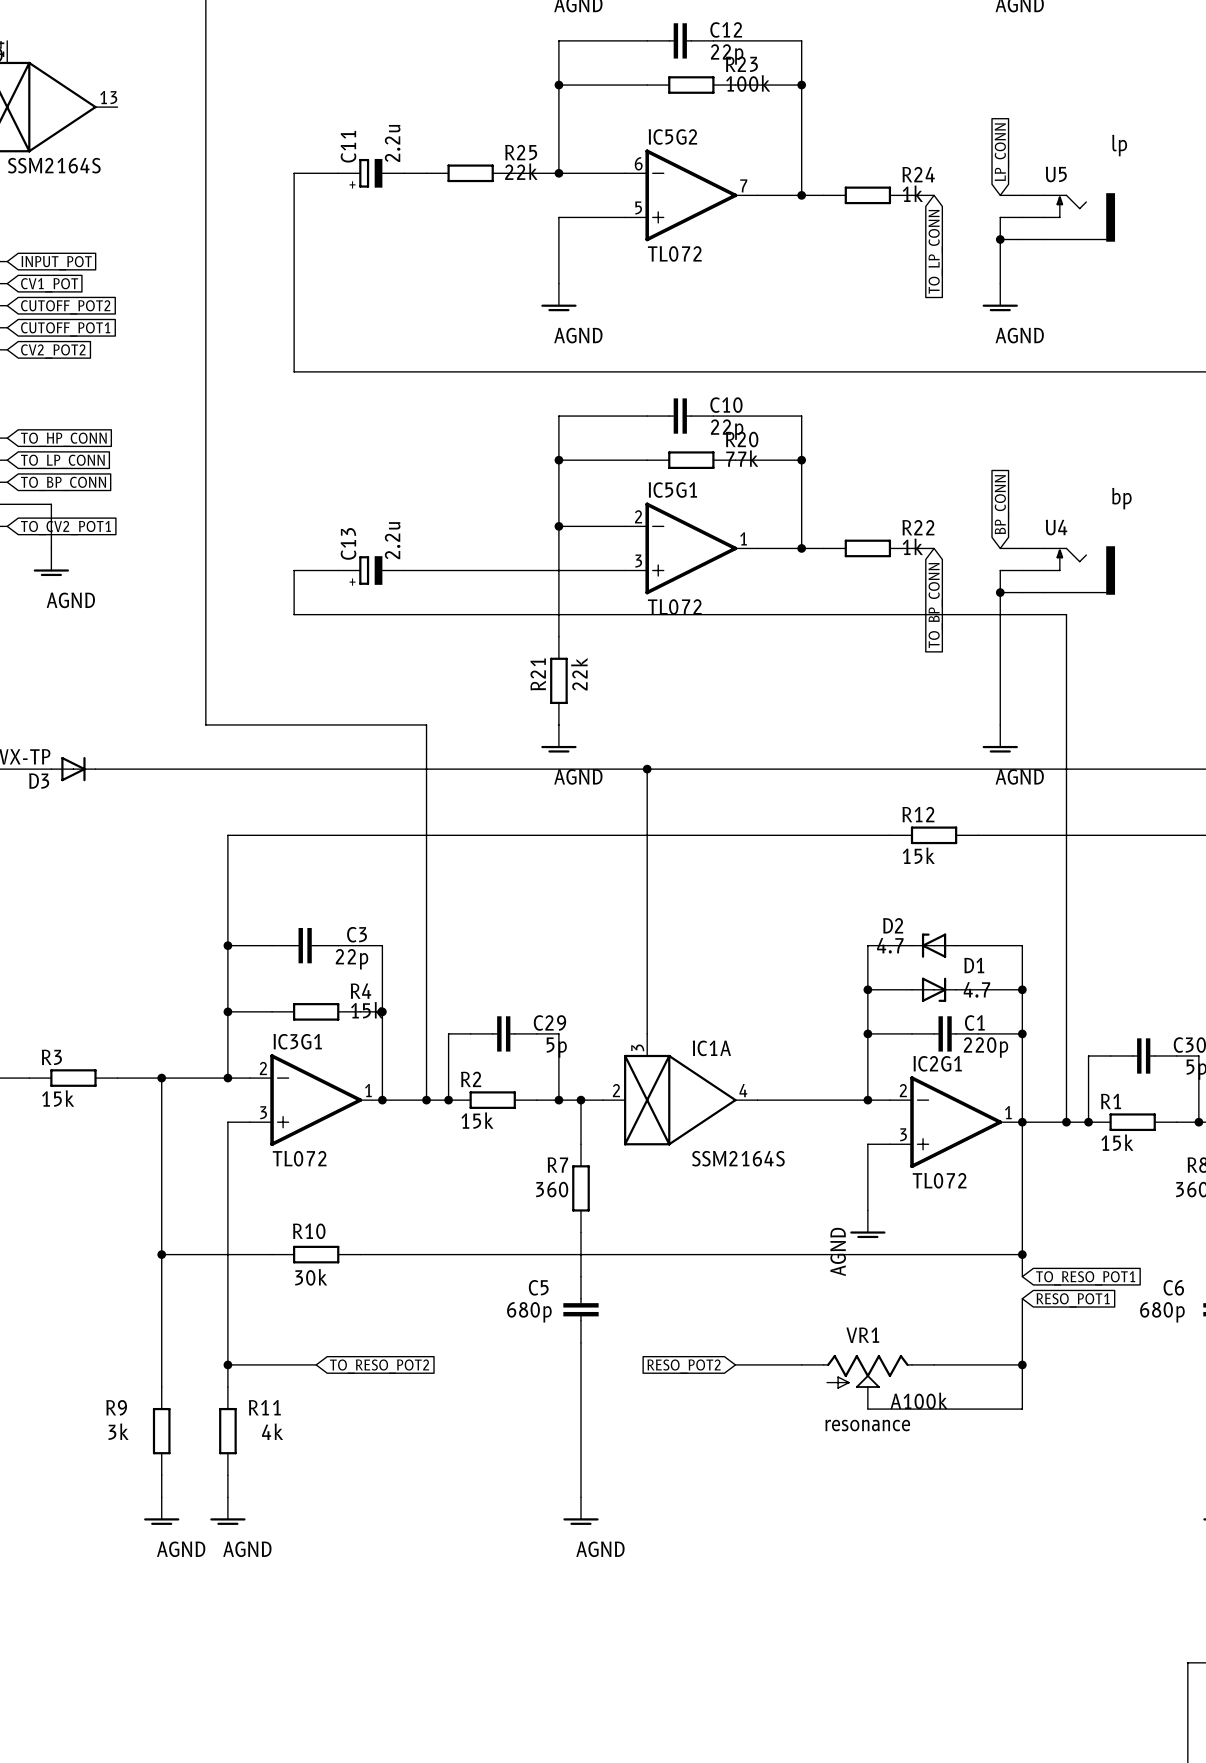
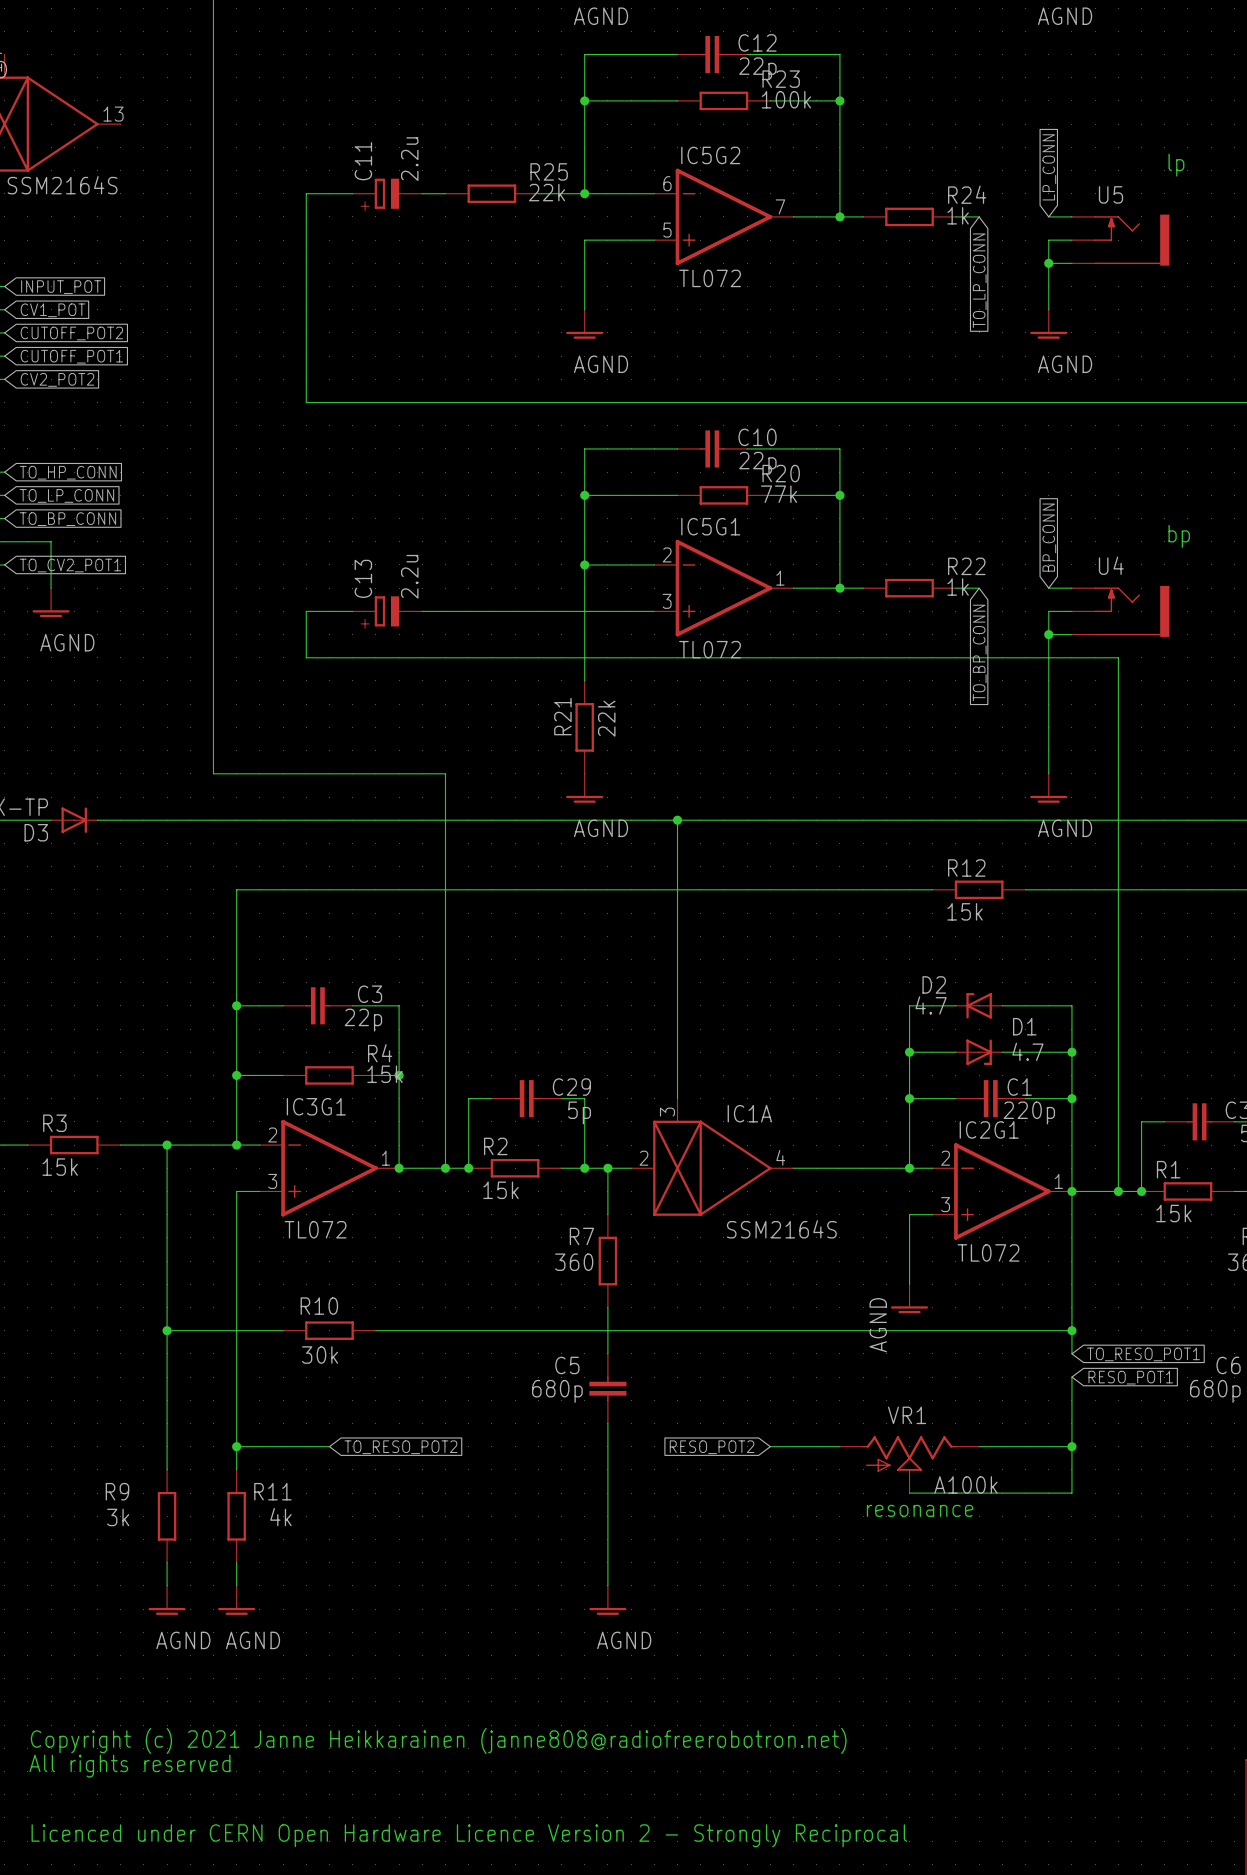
text: none -> Copyright (c) 2021 Janne Heikkarainen (janne808@radiofreerobotron.net) (438, 1740)
text: none -> All rights reserved (129, 1766)
text: none -> Licenced under CERN Open Hardware Licence Version 2 - Strongly Reciprocal (469, 1835)

